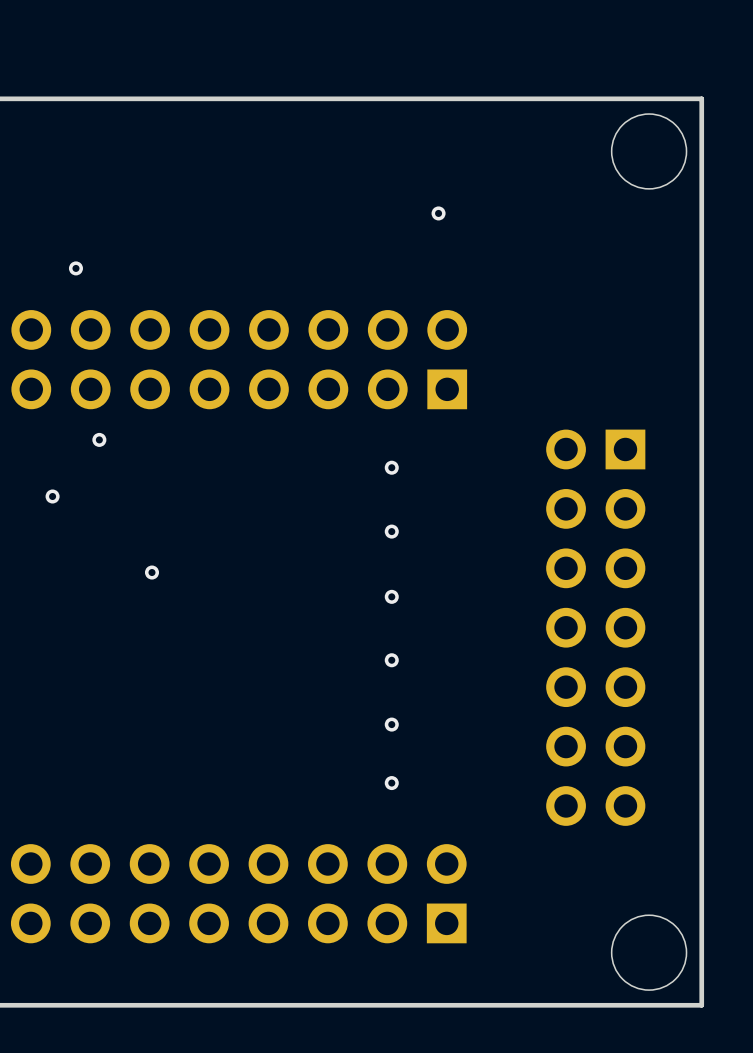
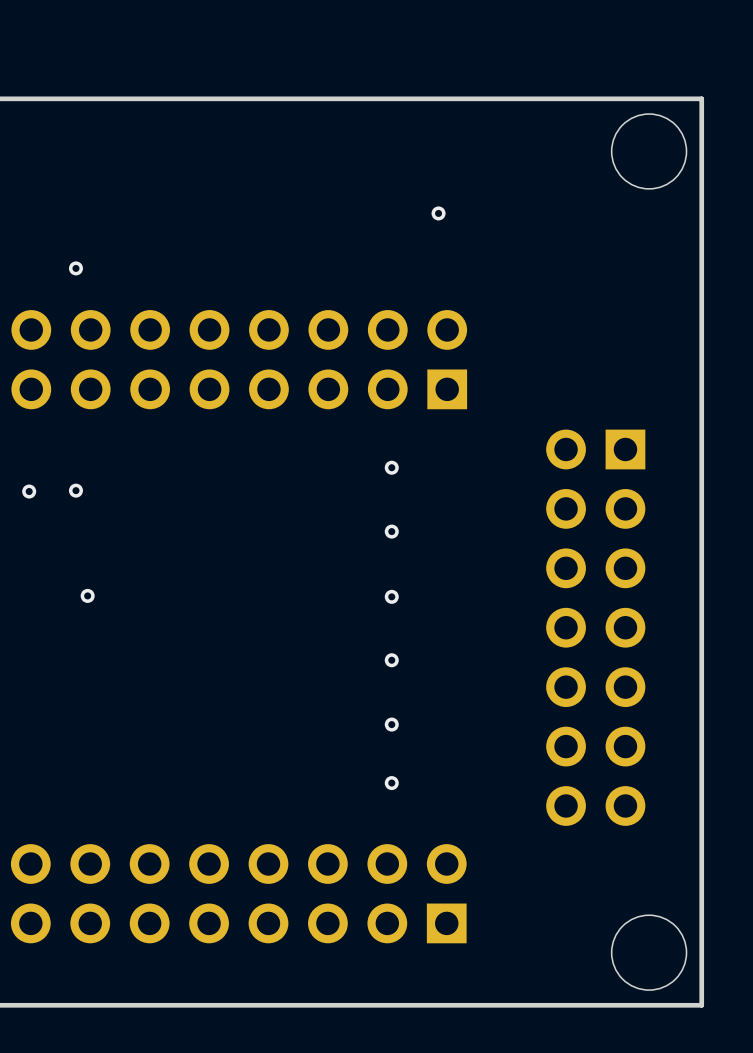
via: (99, 439) -> none
via: none -> (75, 490)
via: none -> (29, 491)
via: (52, 496) -> none
via: (151, 572) -> none
via: none -> (87, 595)

